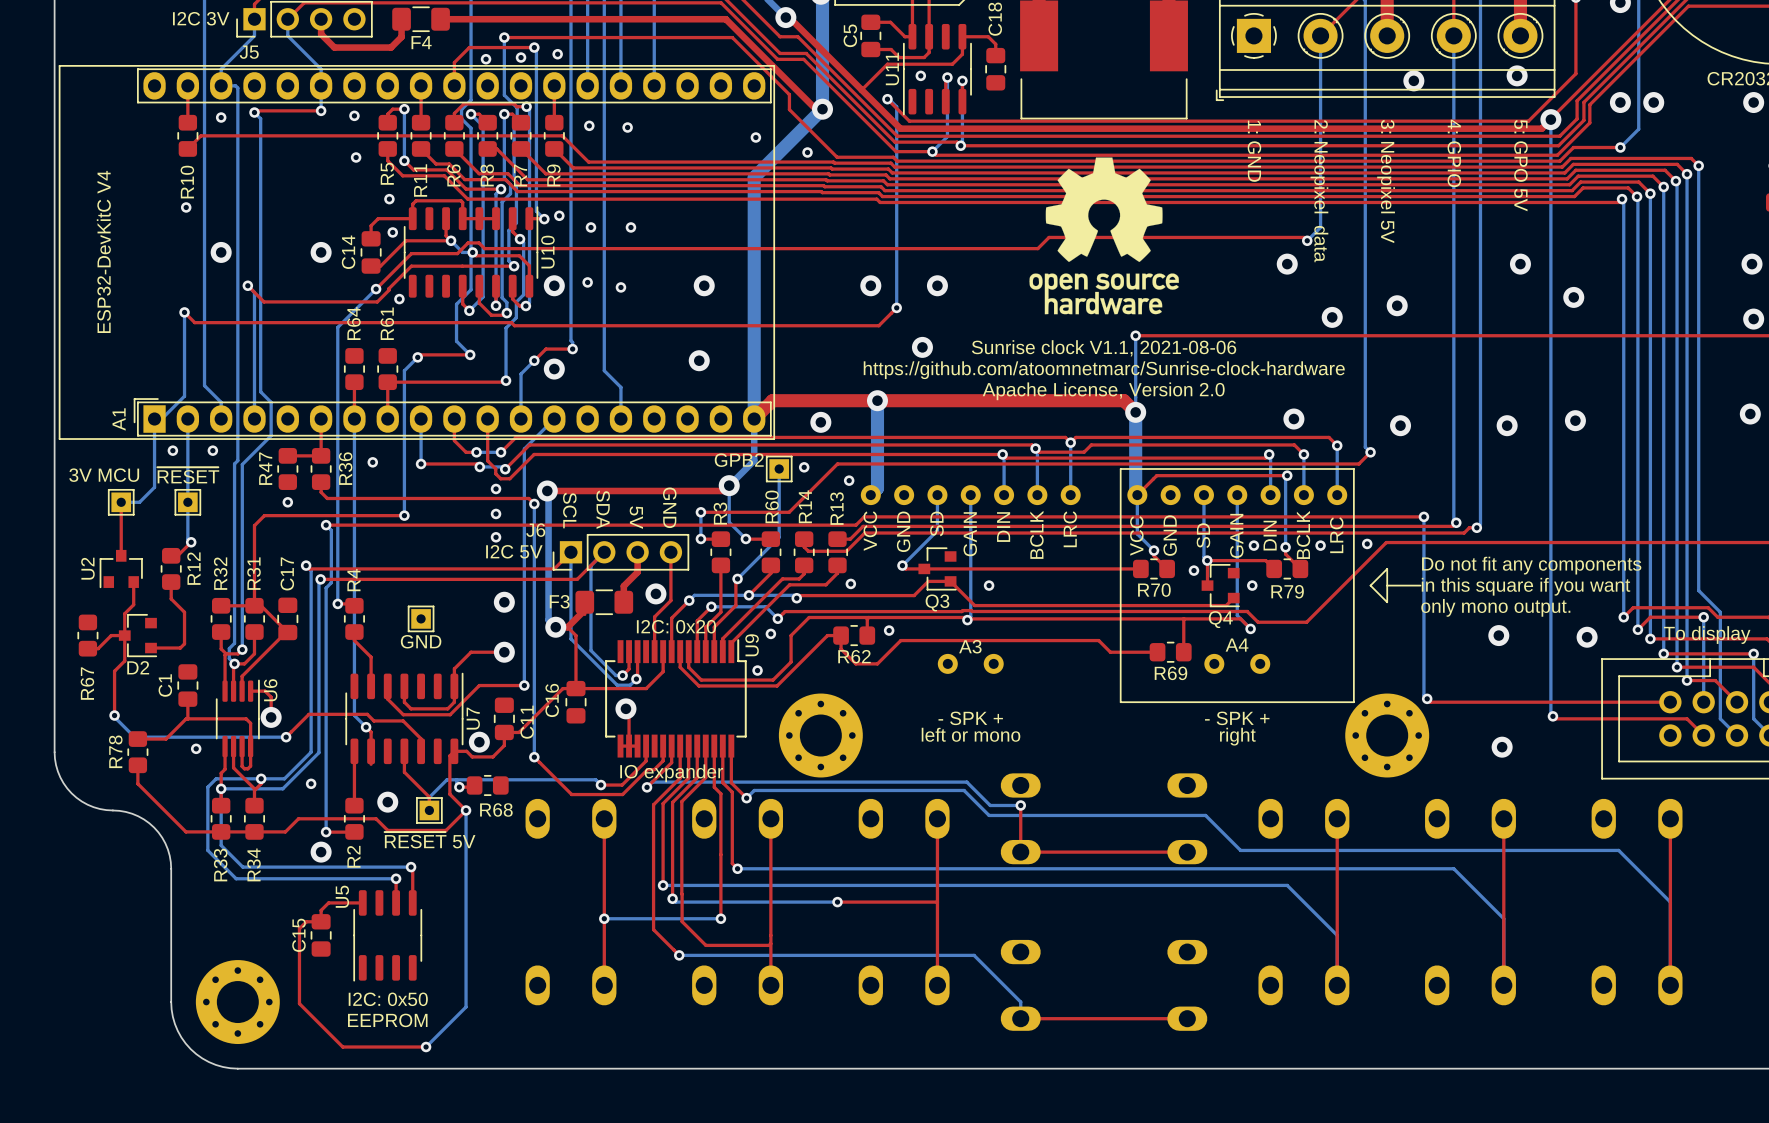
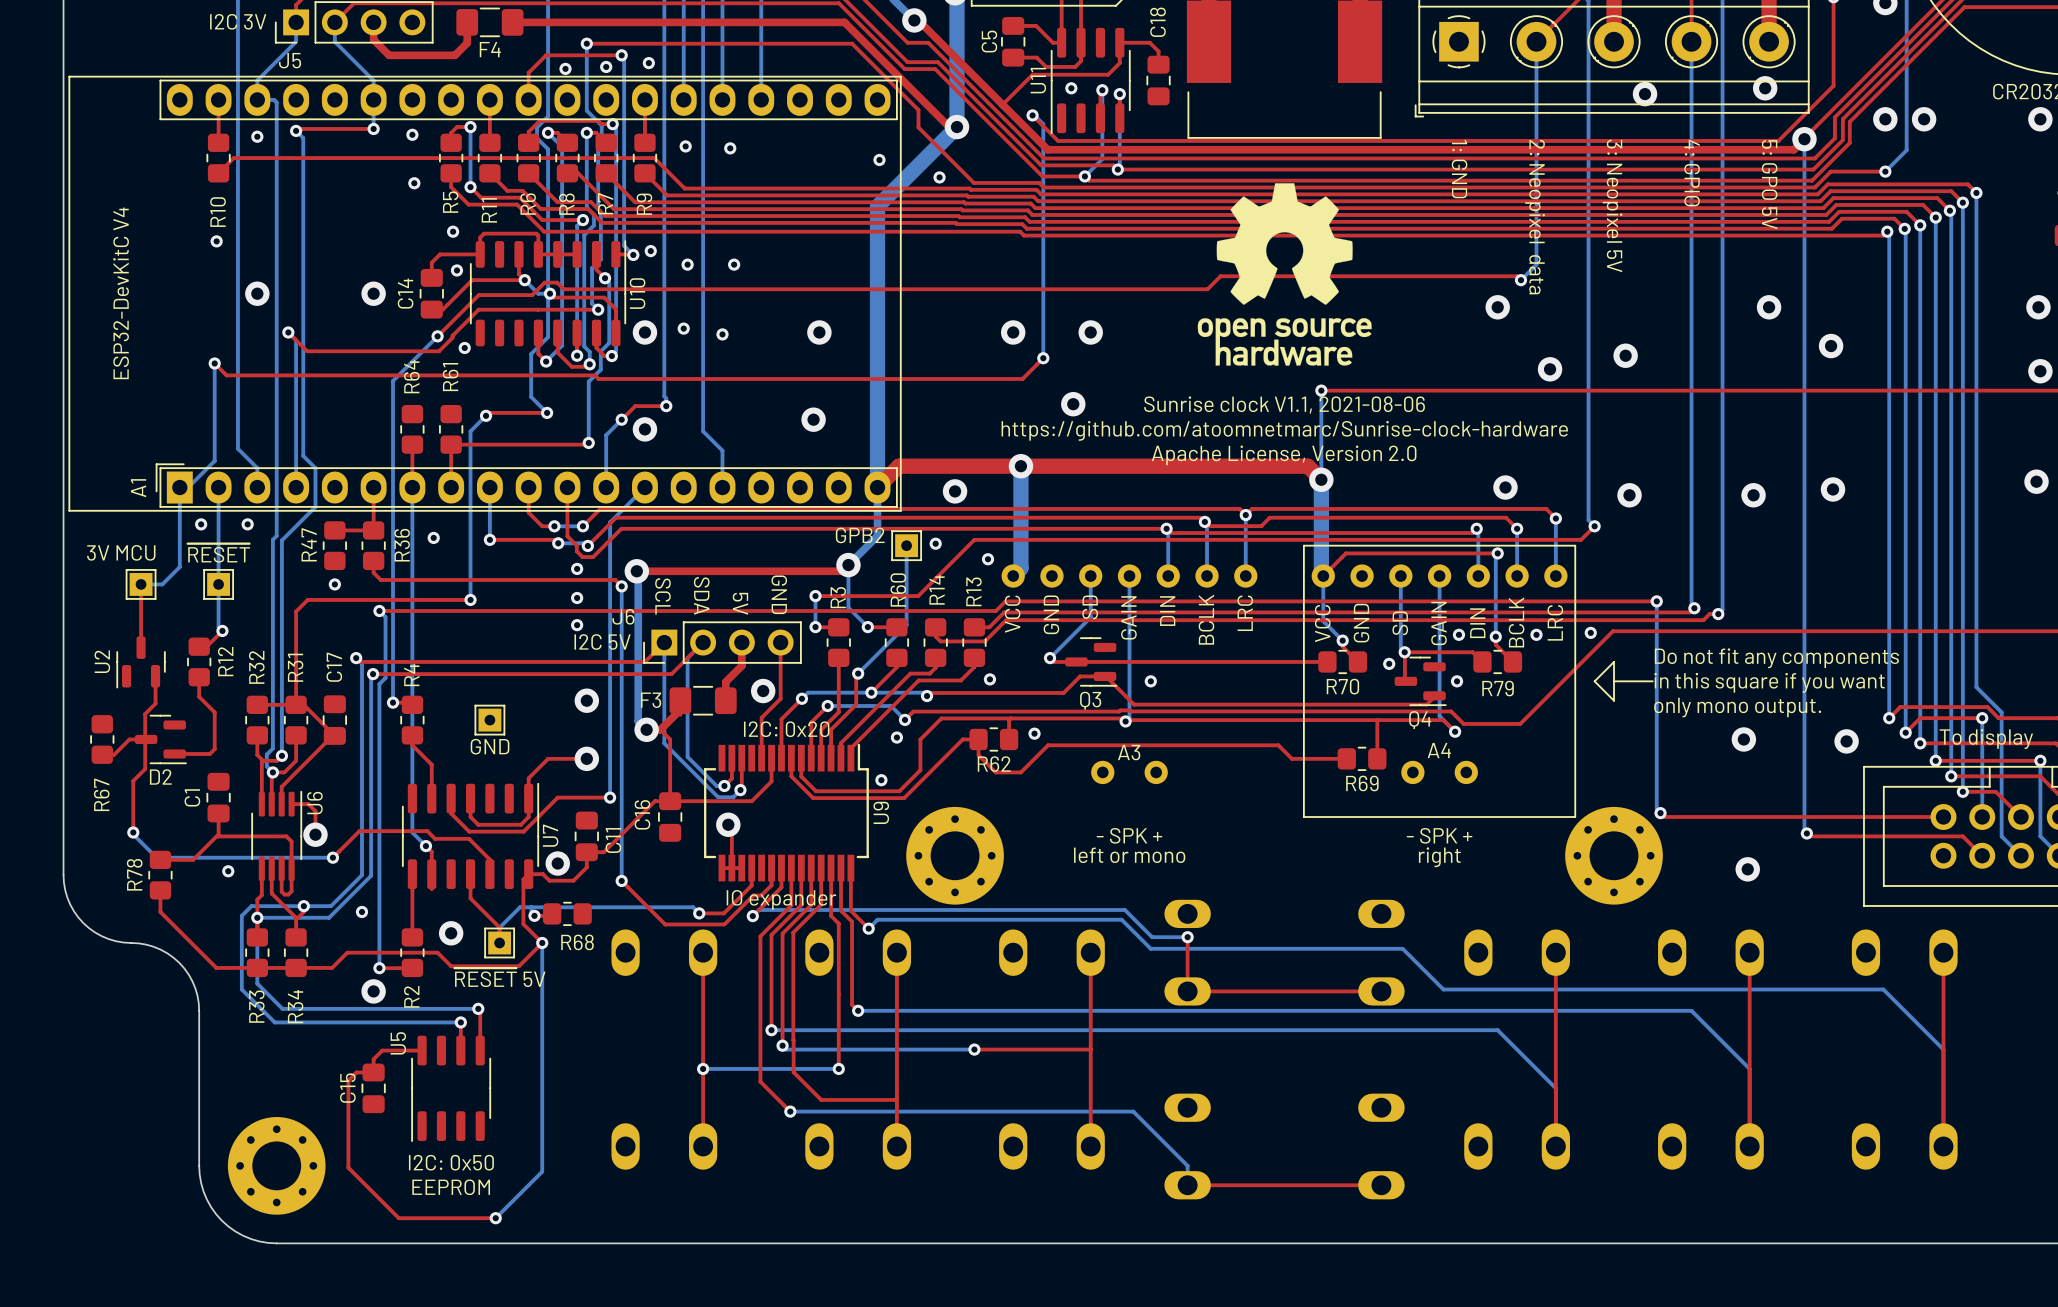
Q3 footprint: [918, 547, 957, 591] -> [1065, 637, 1118, 687]
U2 footprint: [99, 549, 143, 589] -> [116, 636, 166, 689]
Q4 footprint: [1201, 564, 1240, 608] -> [1394, 656, 1447, 707]
D2 footprint: [118, 614, 158, 658] -> [134, 714, 187, 765]
U9 name position: U9 (752, 645) -> U9 (881, 812)

